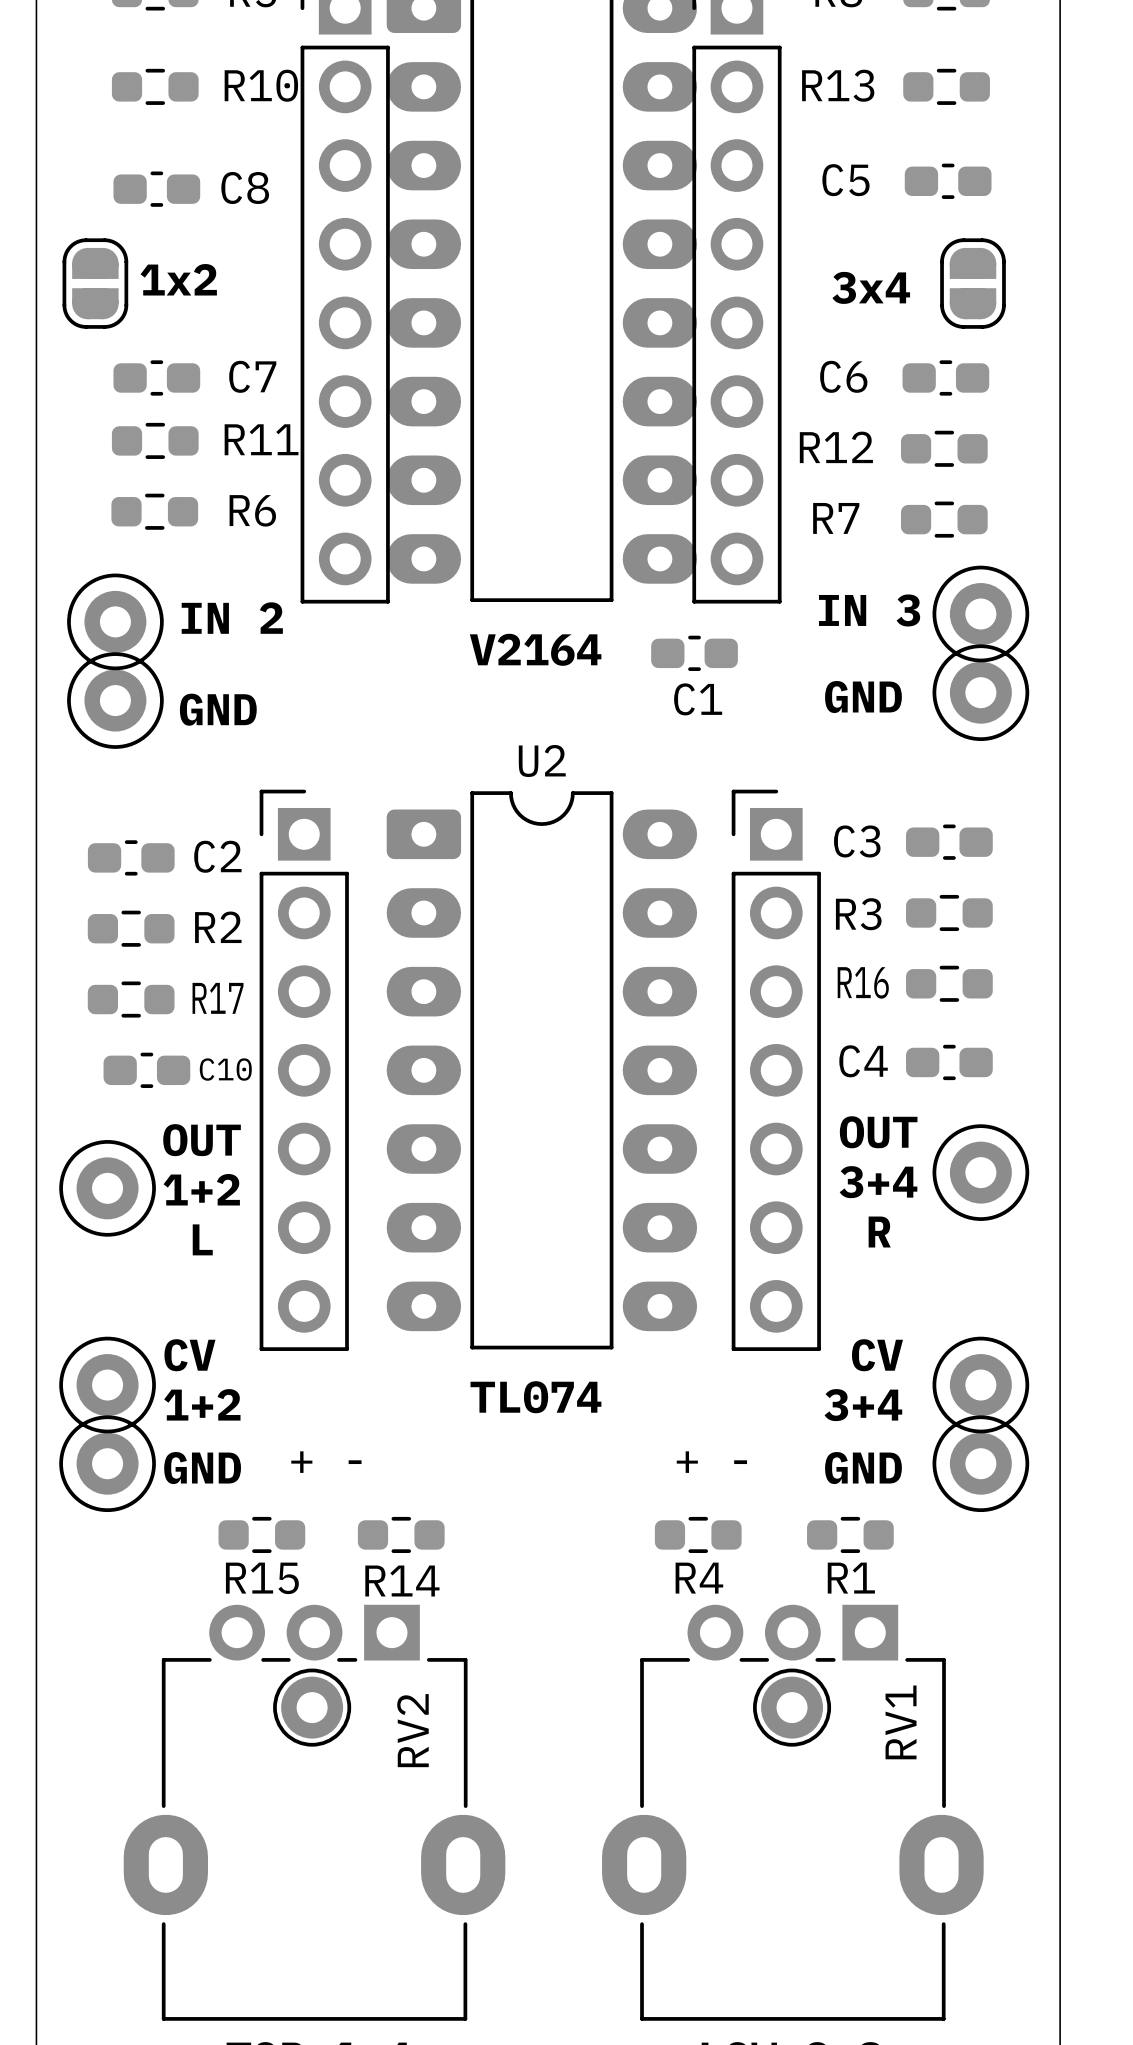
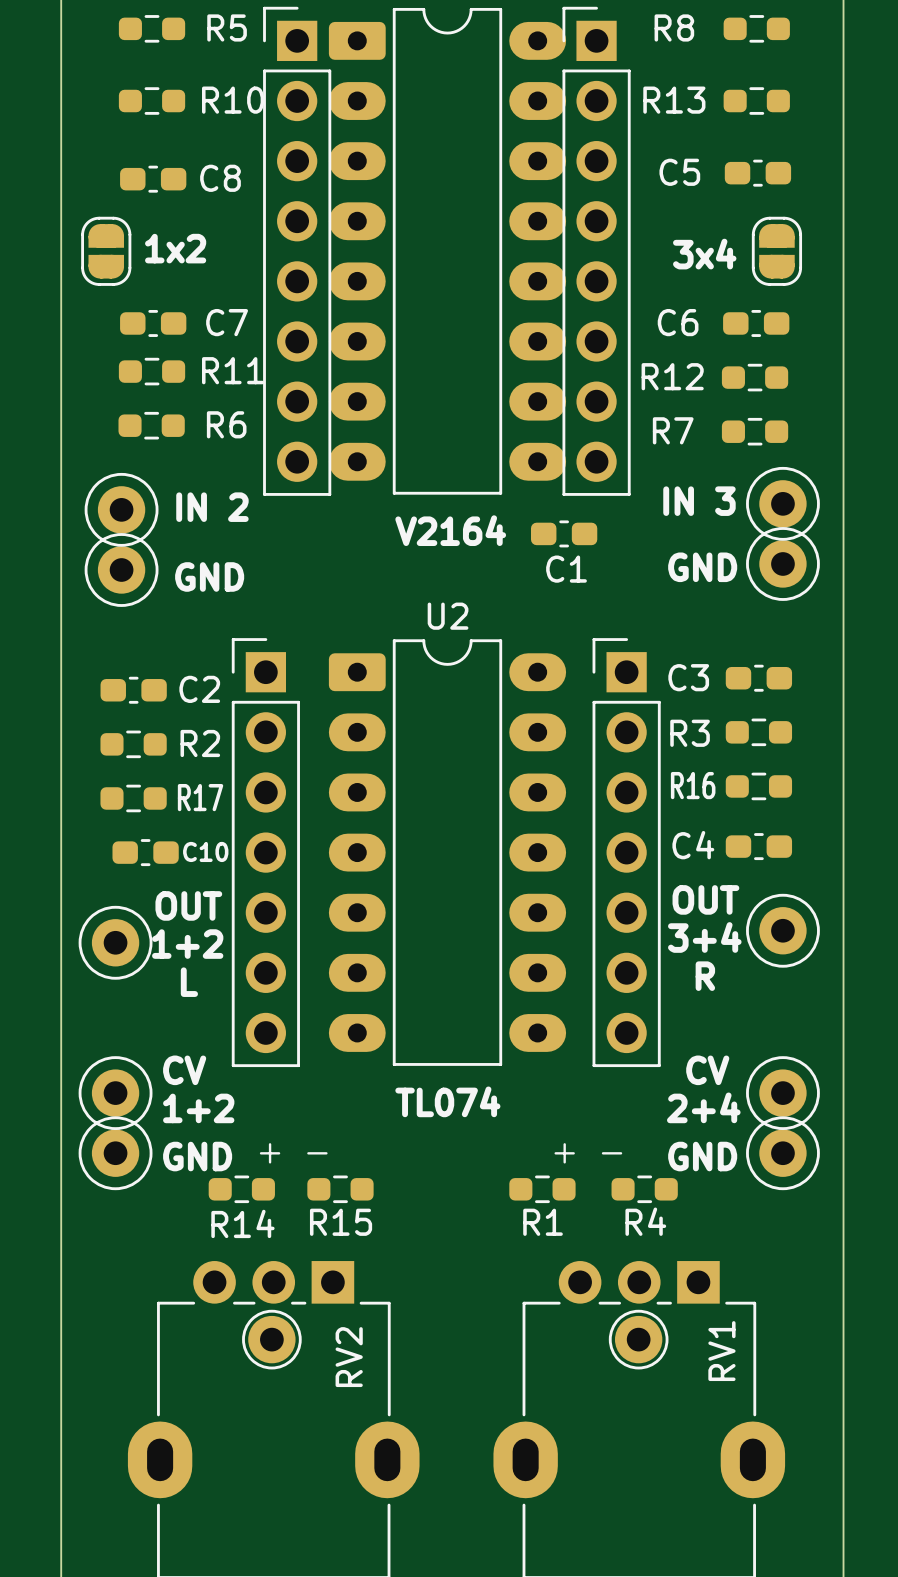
text: 3+4 (863, 1405) -> 2+4 (703, 1107)
R15 position: (261, 1534) -> (340, 1189)
R14 position: (401, 1534) -> (241, 1189)
R4 position: (698, 1534) -> (644, 1189)
R1 position: (850, 1534) -> (542, 1189)

